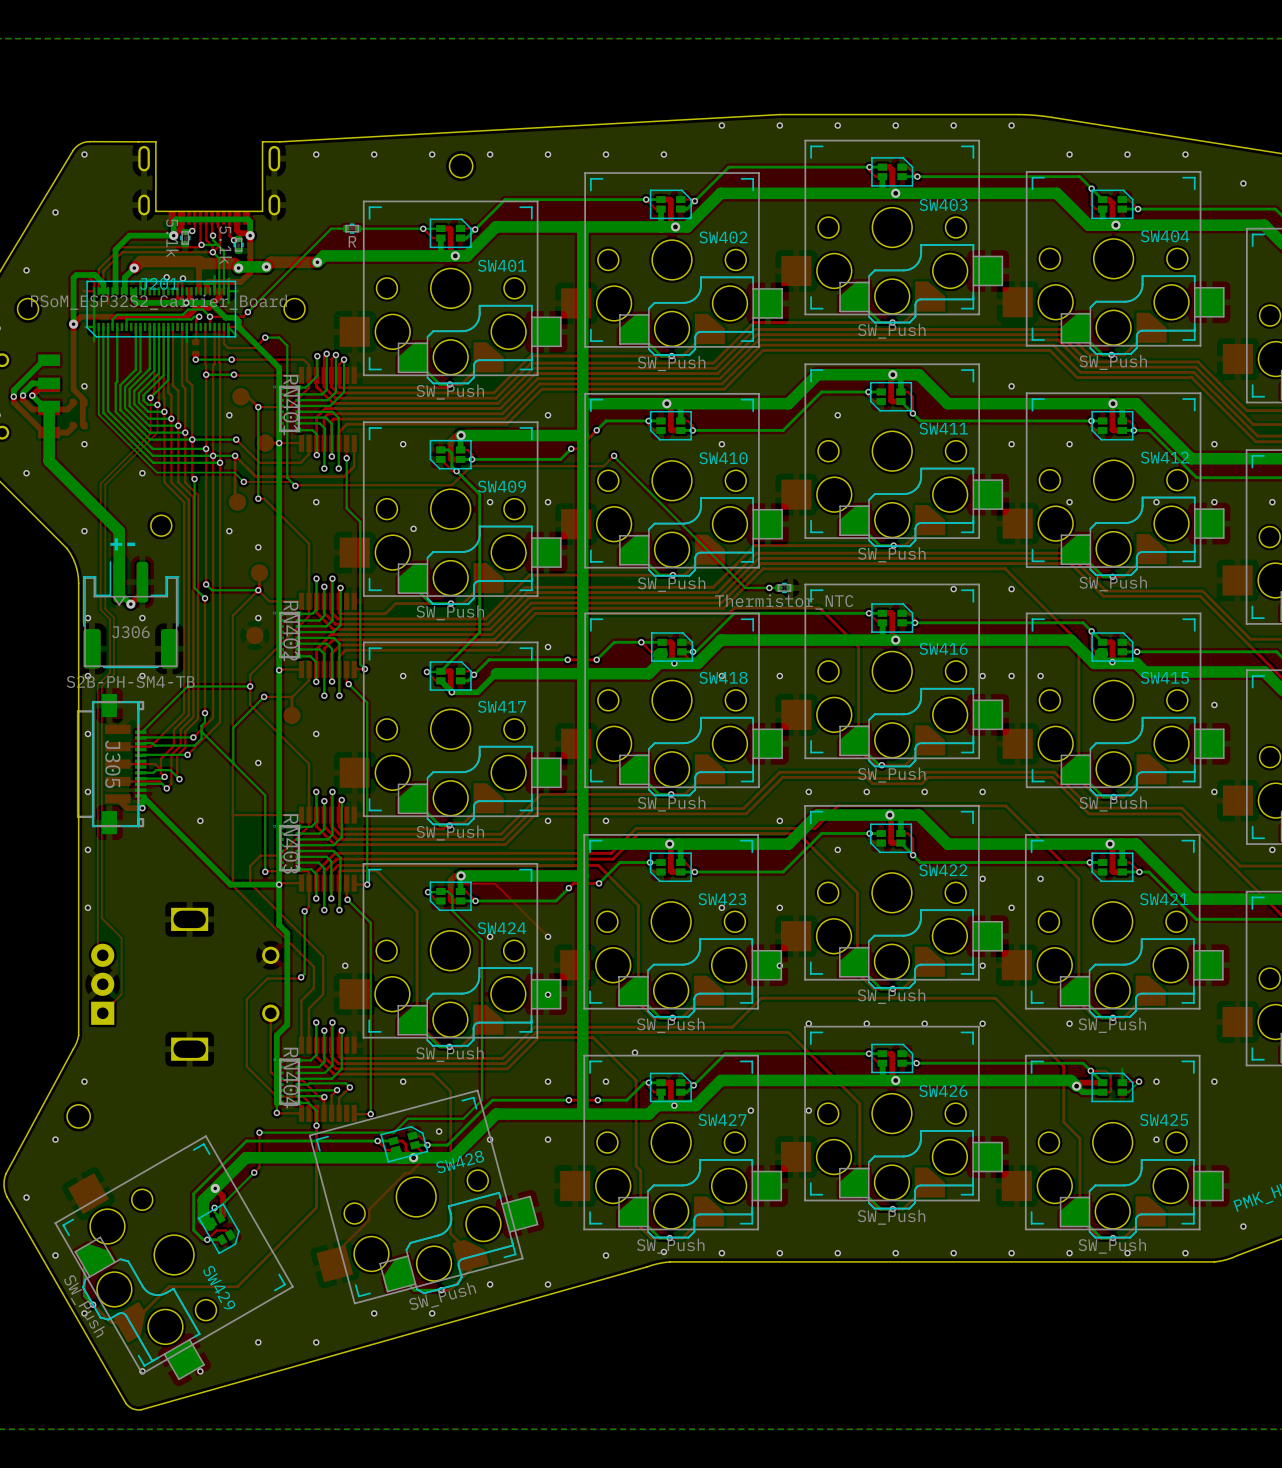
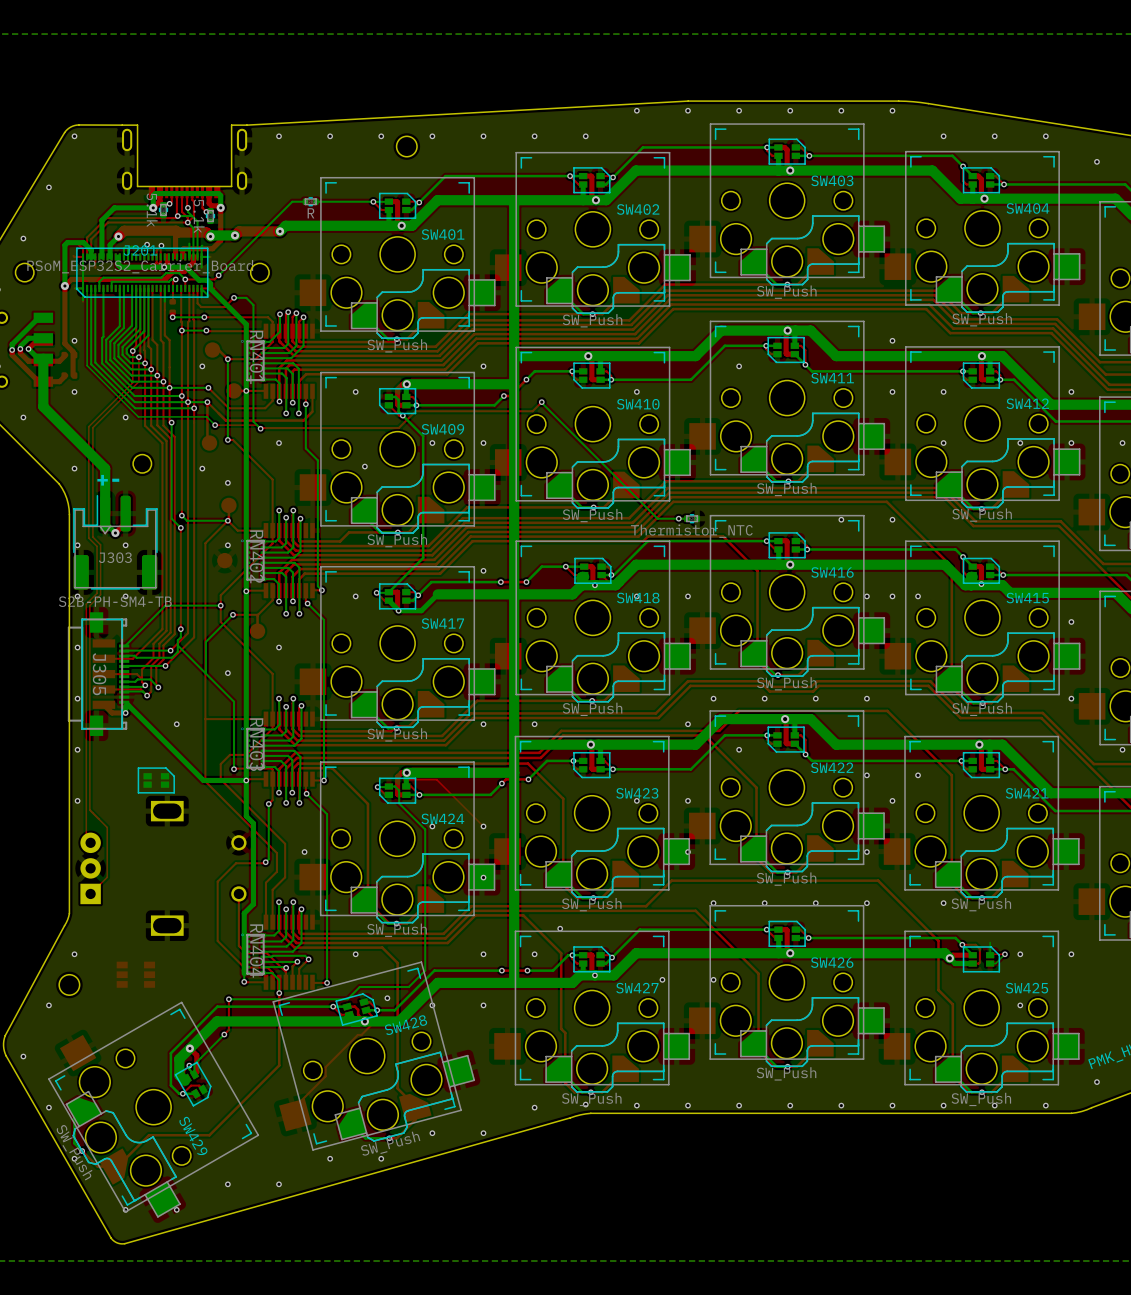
J306 name: J306 (130, 632) -> J303 (115, 557)
part: none -> (156, 780)
part: none -> (135, 974)

